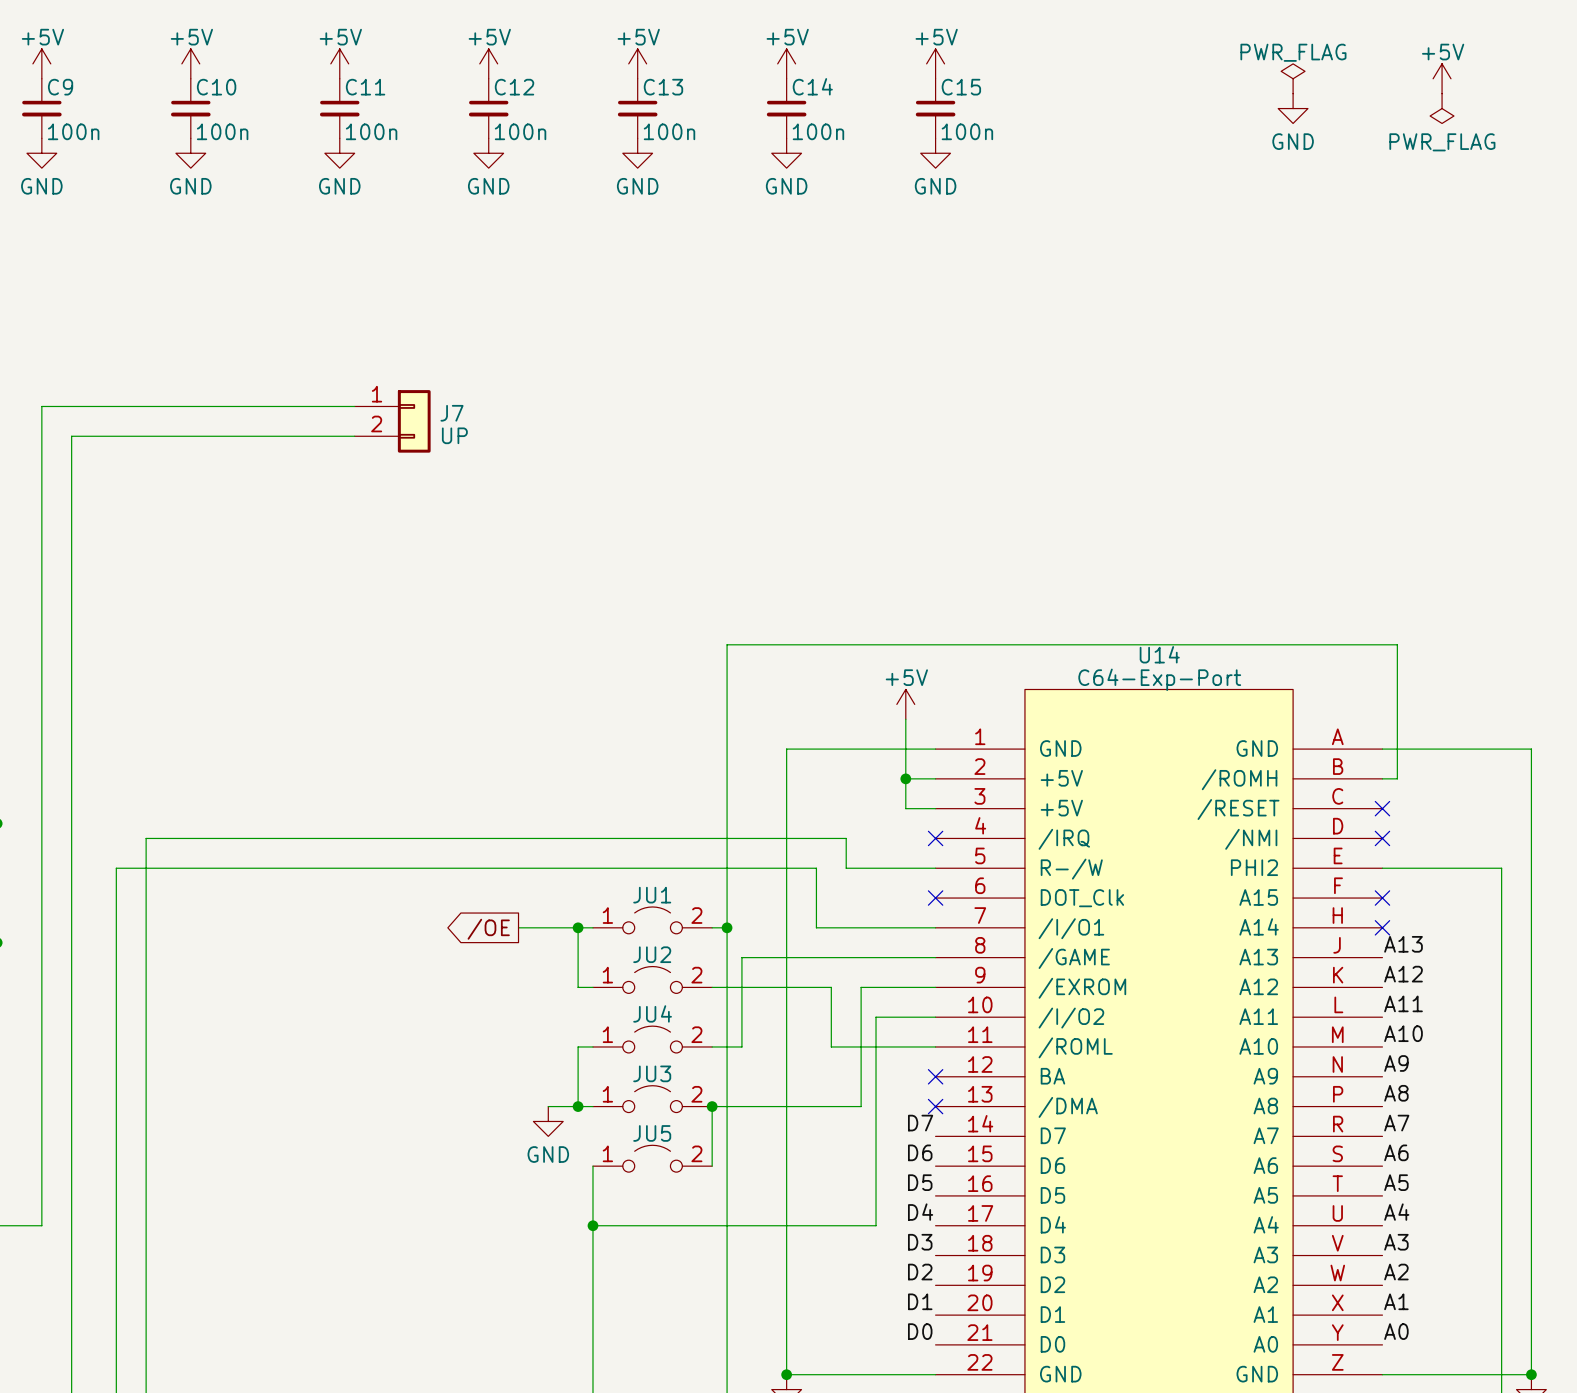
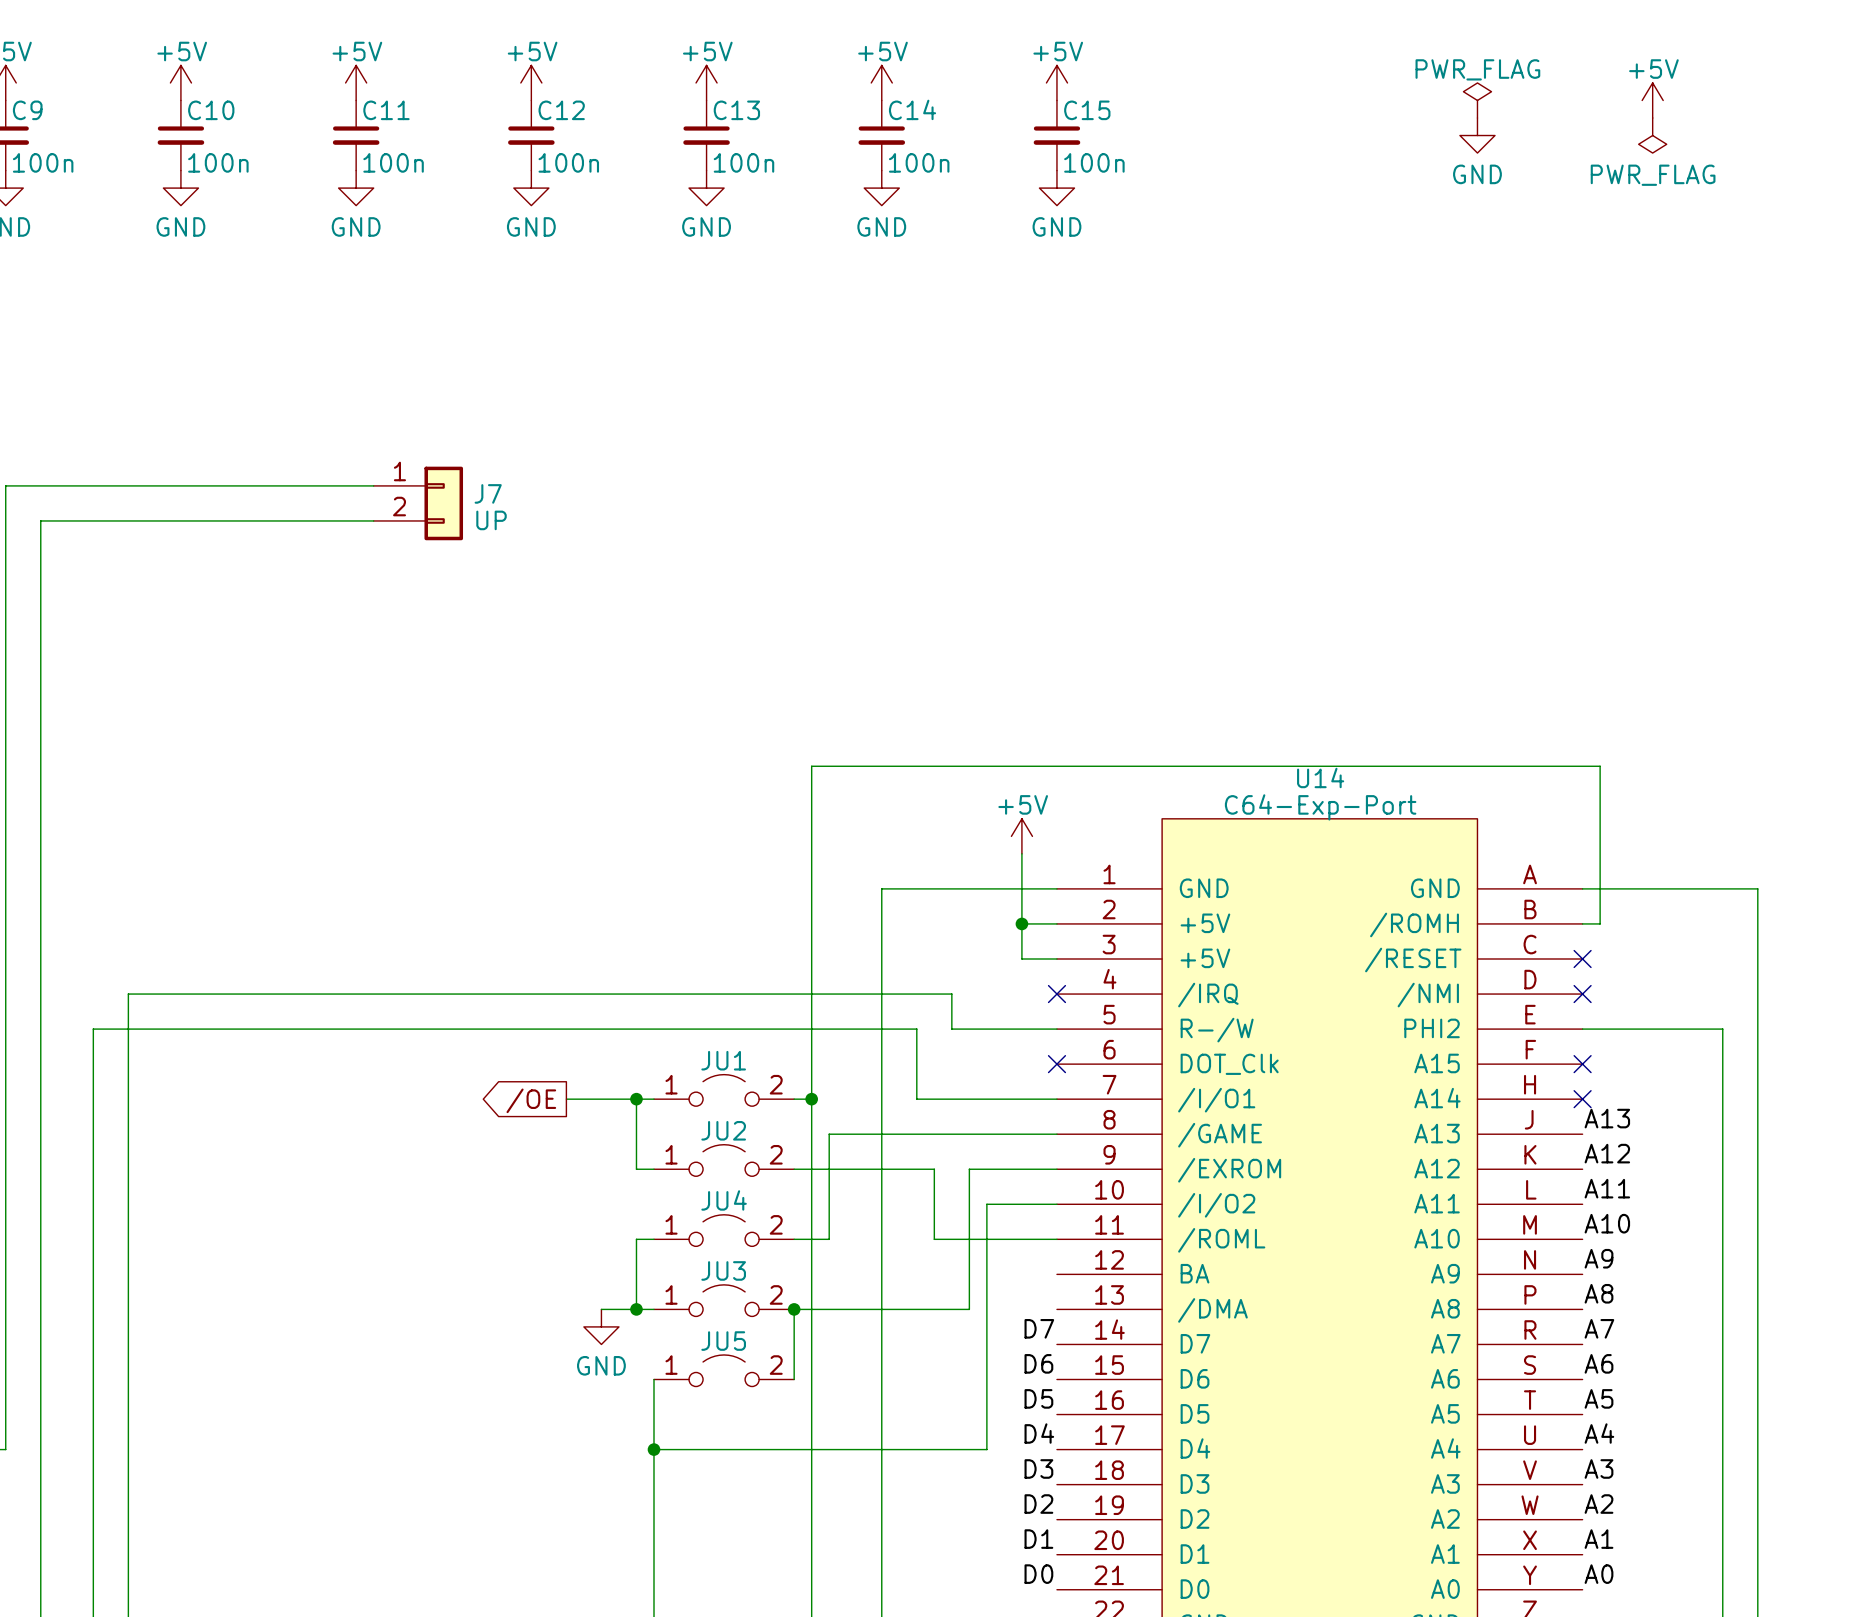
no-connect mark: (935, 1076) -> none
no-connect mark: (935, 1106) -> none

